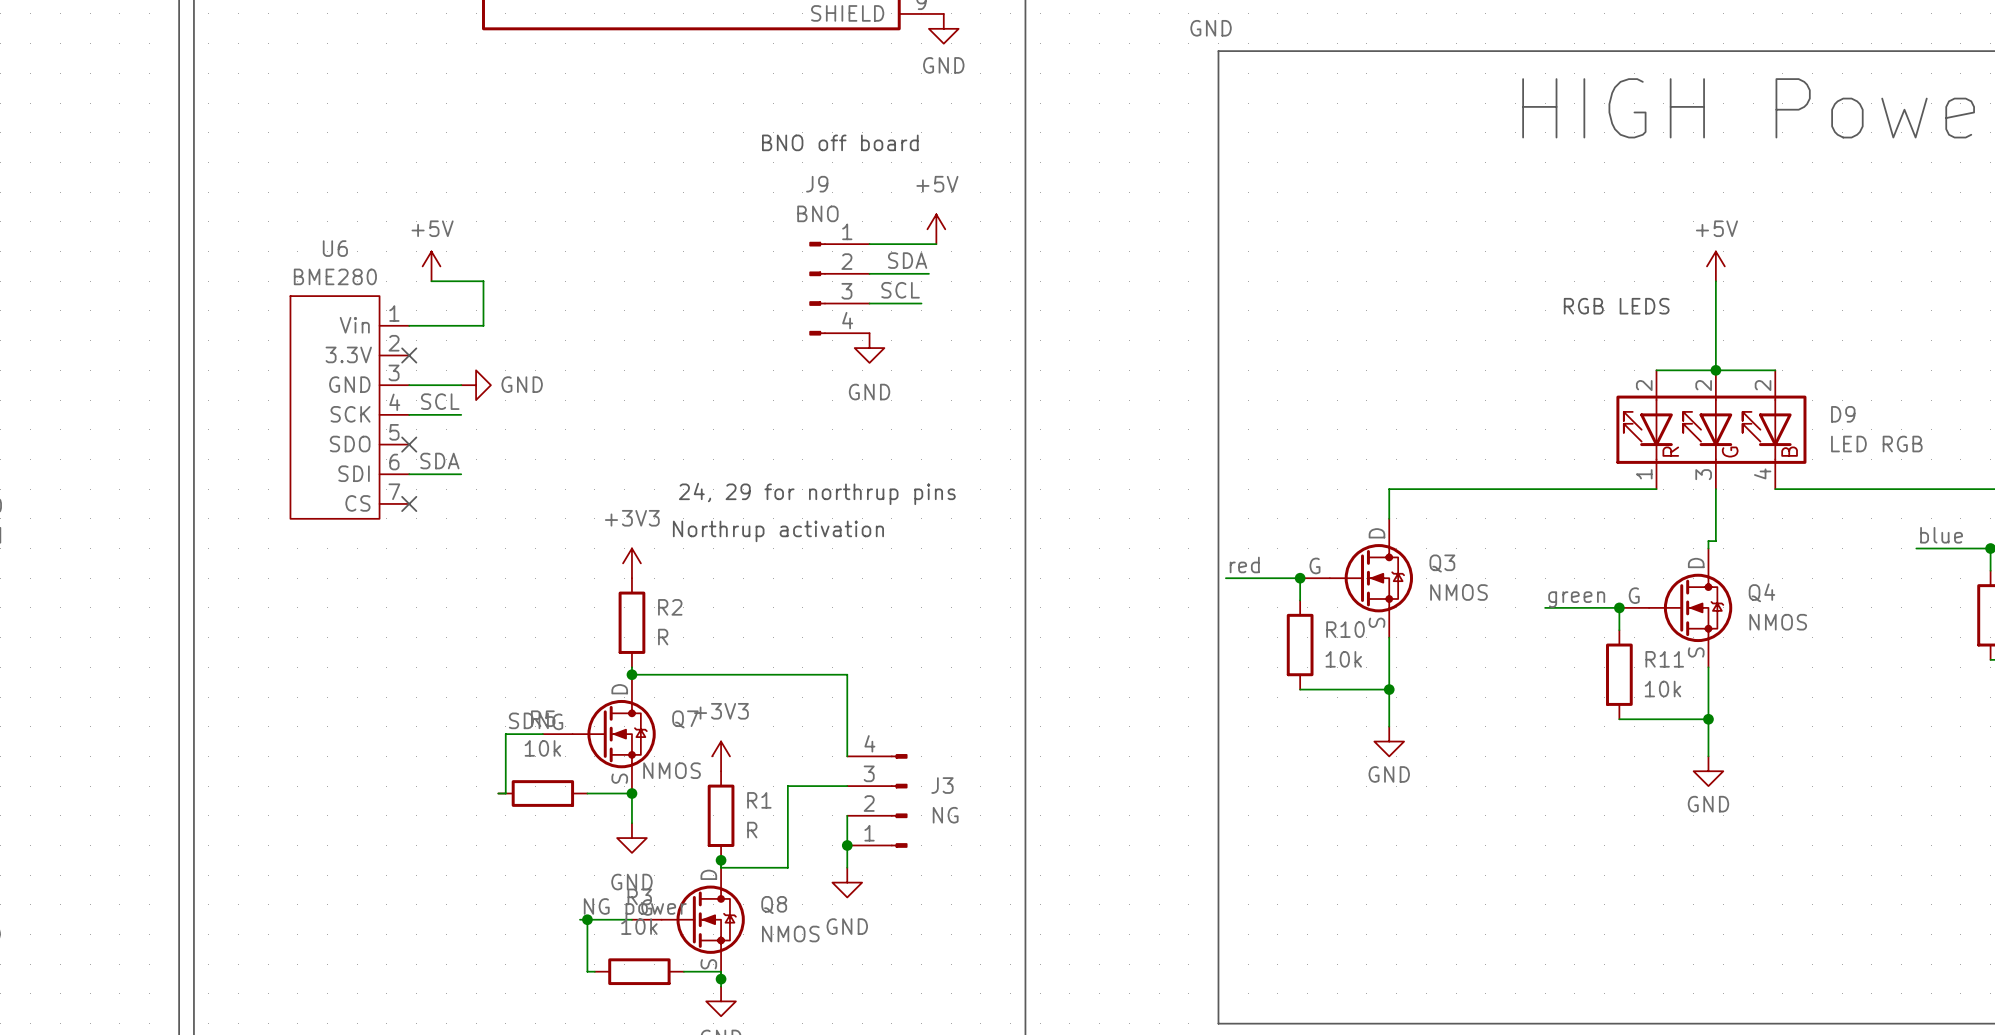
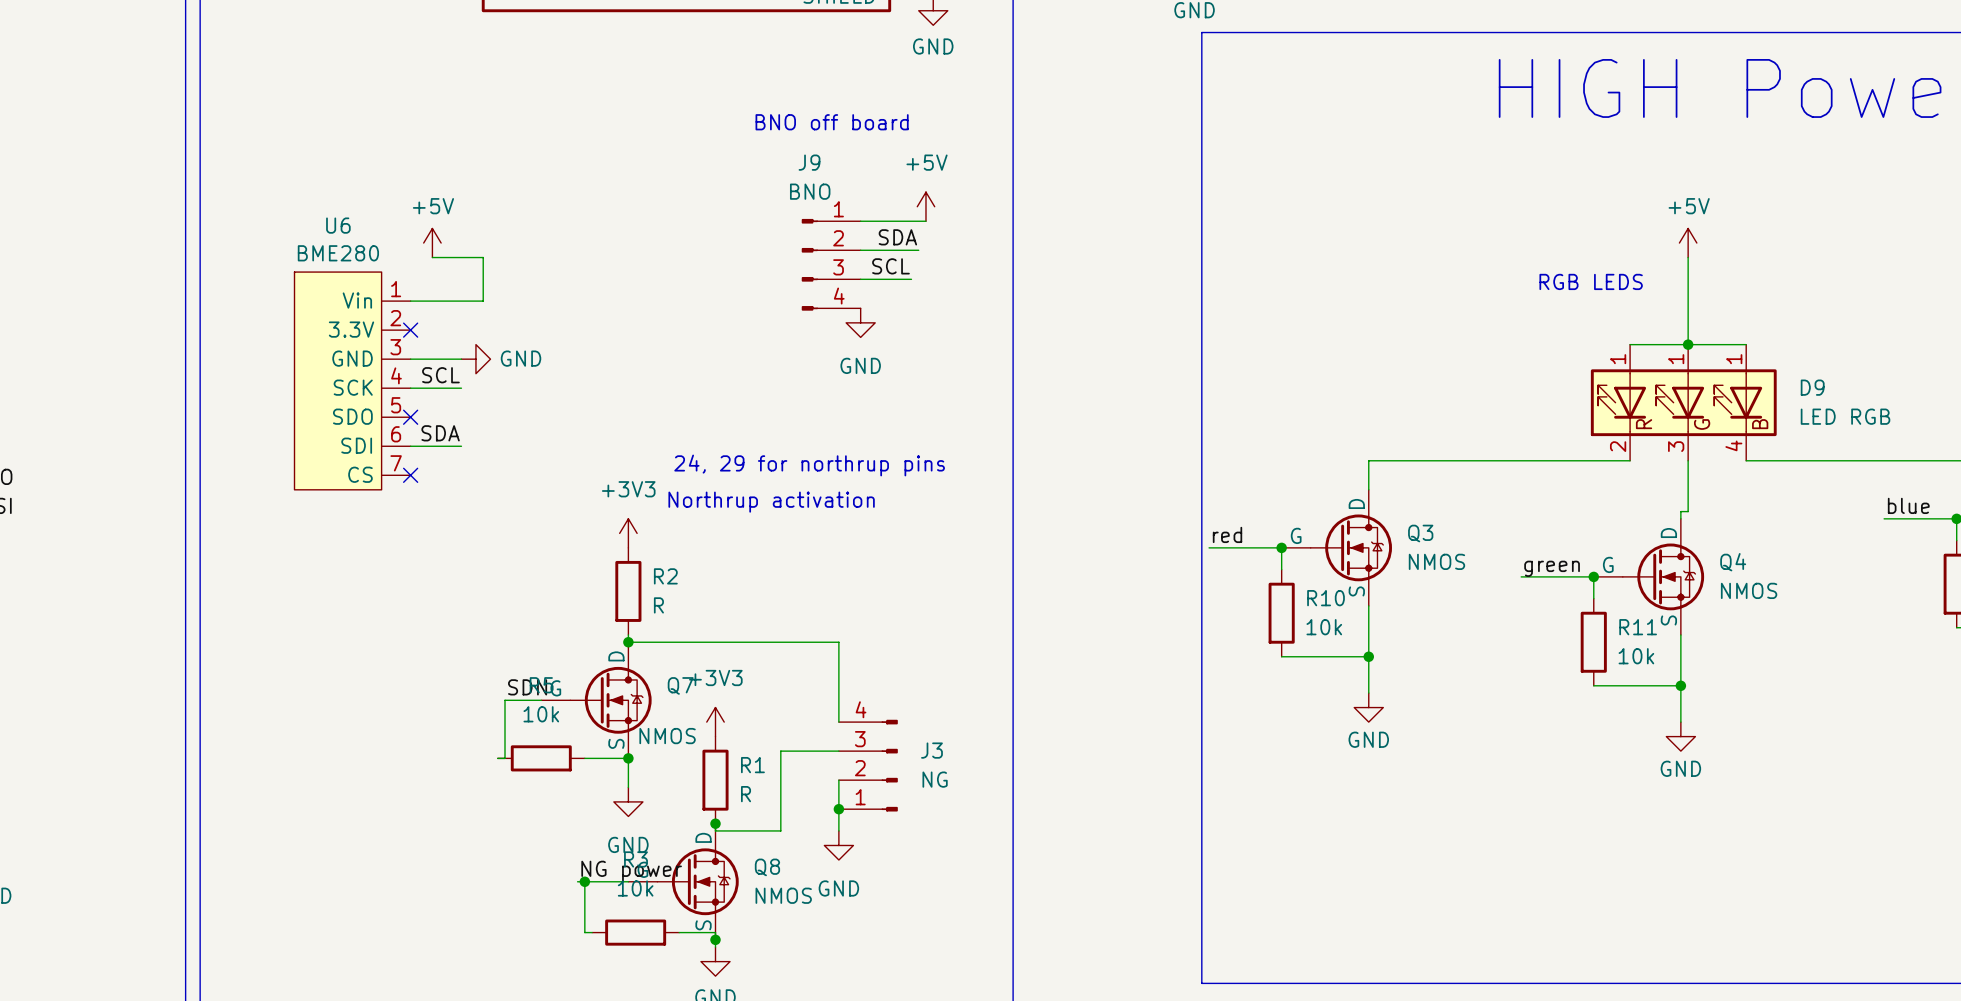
D9 pin number: 2 (1644, 385) -> 1 (1618, 359)
D9 pin number: 2 (1703, 385) -> 1 (1676, 359)
D9 pin number: 2 (1763, 385) -> 1 (1734, 359)
D9 pin number: 1 (1644, 474) -> 2 (1618, 446)

